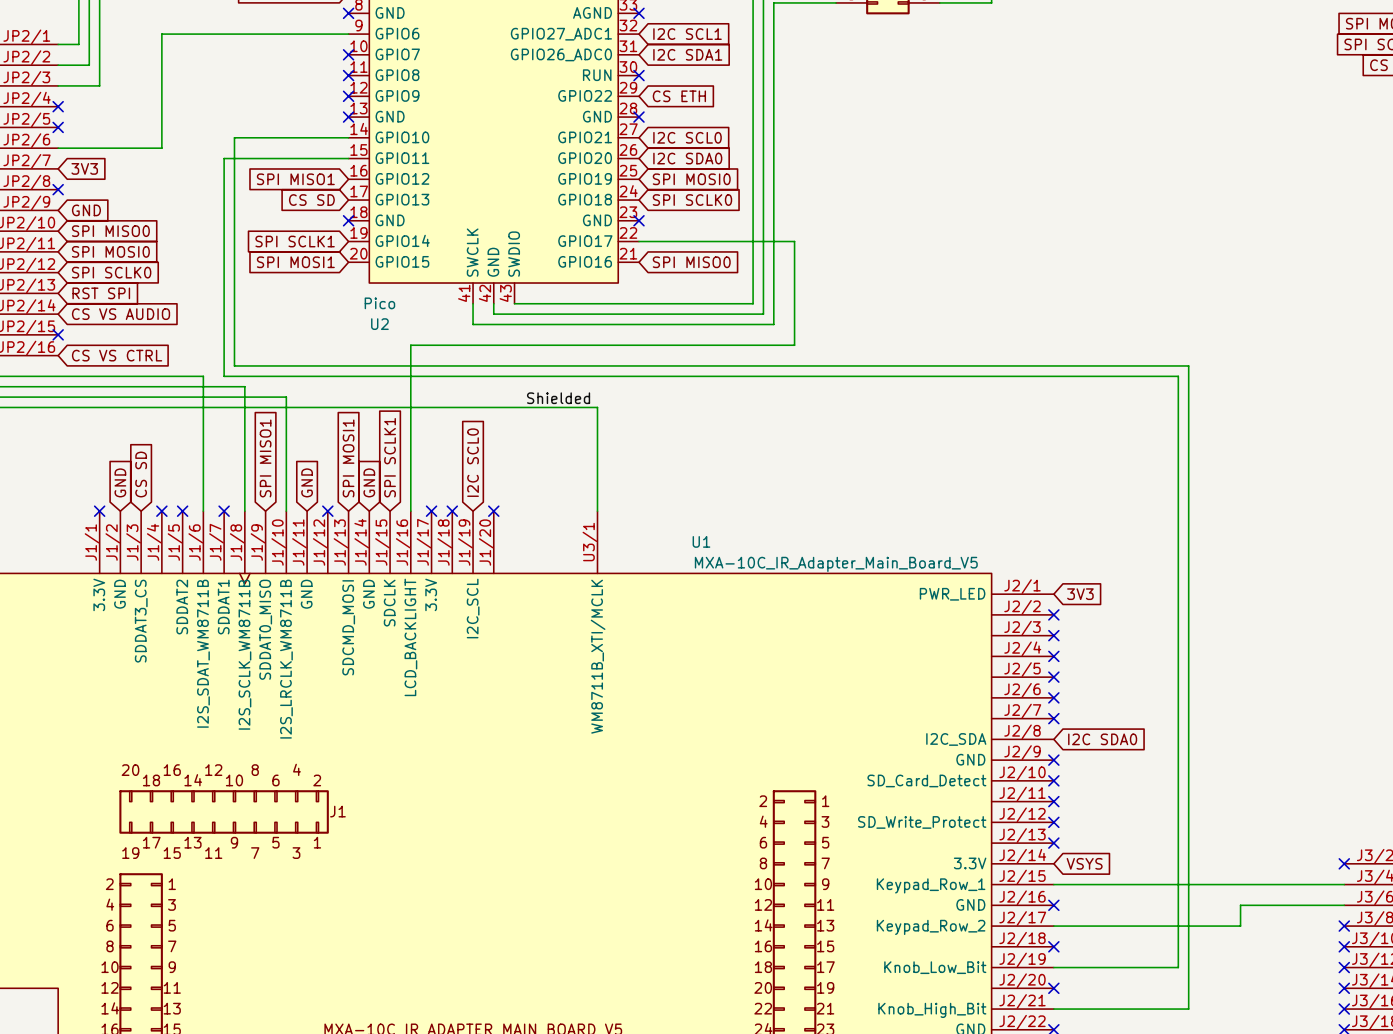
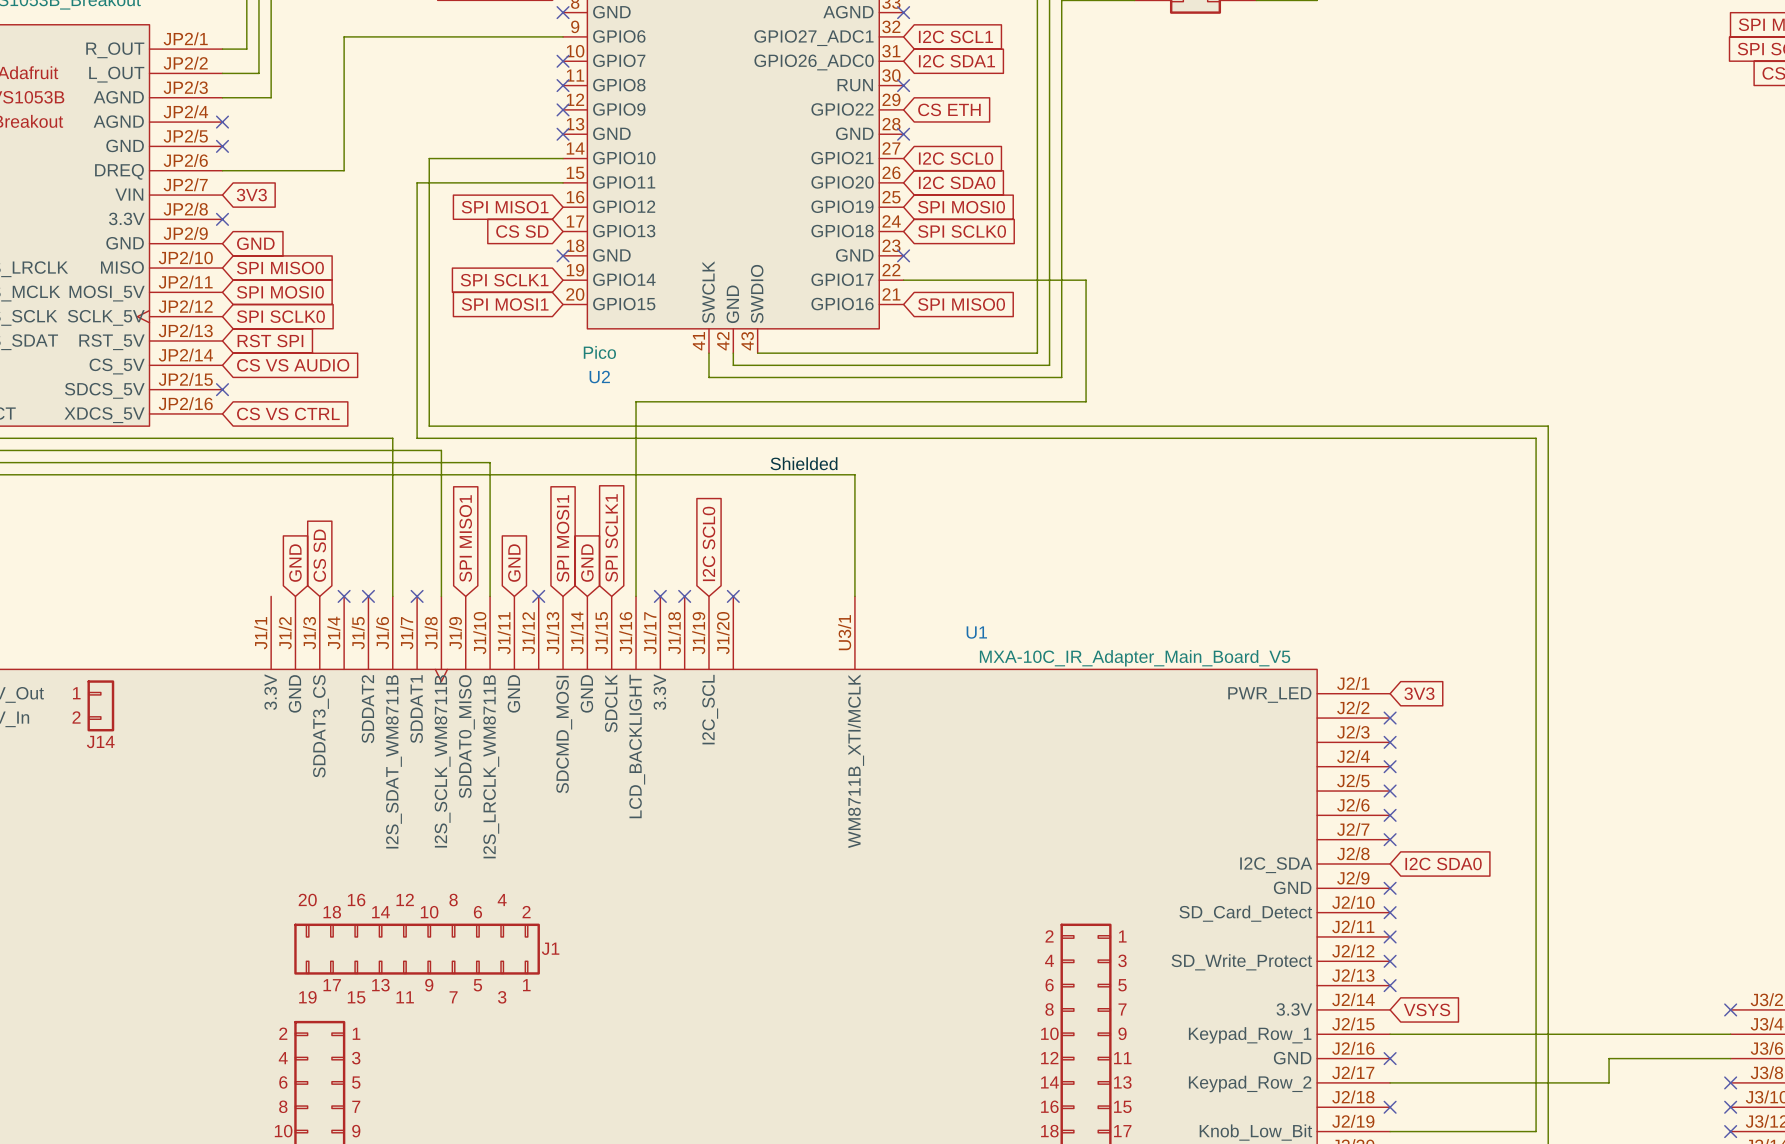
no-connect mark: (99, 511) -> none

